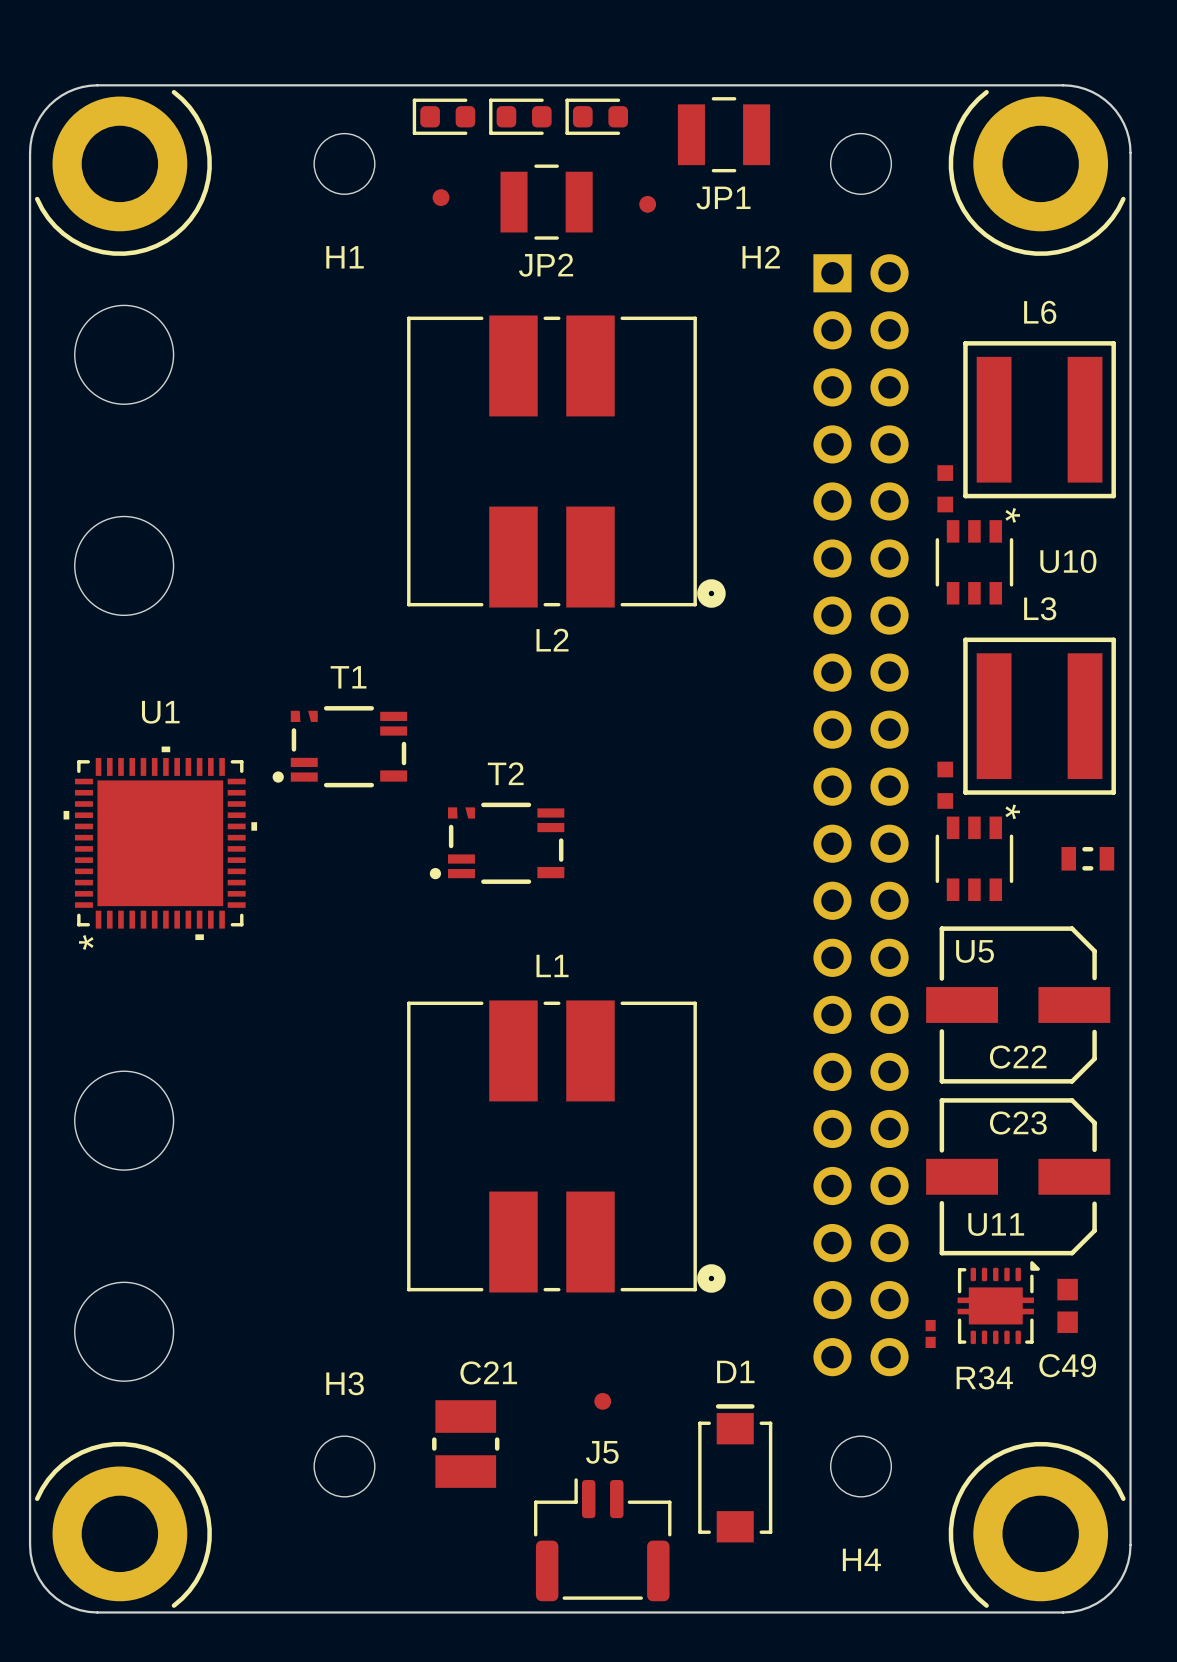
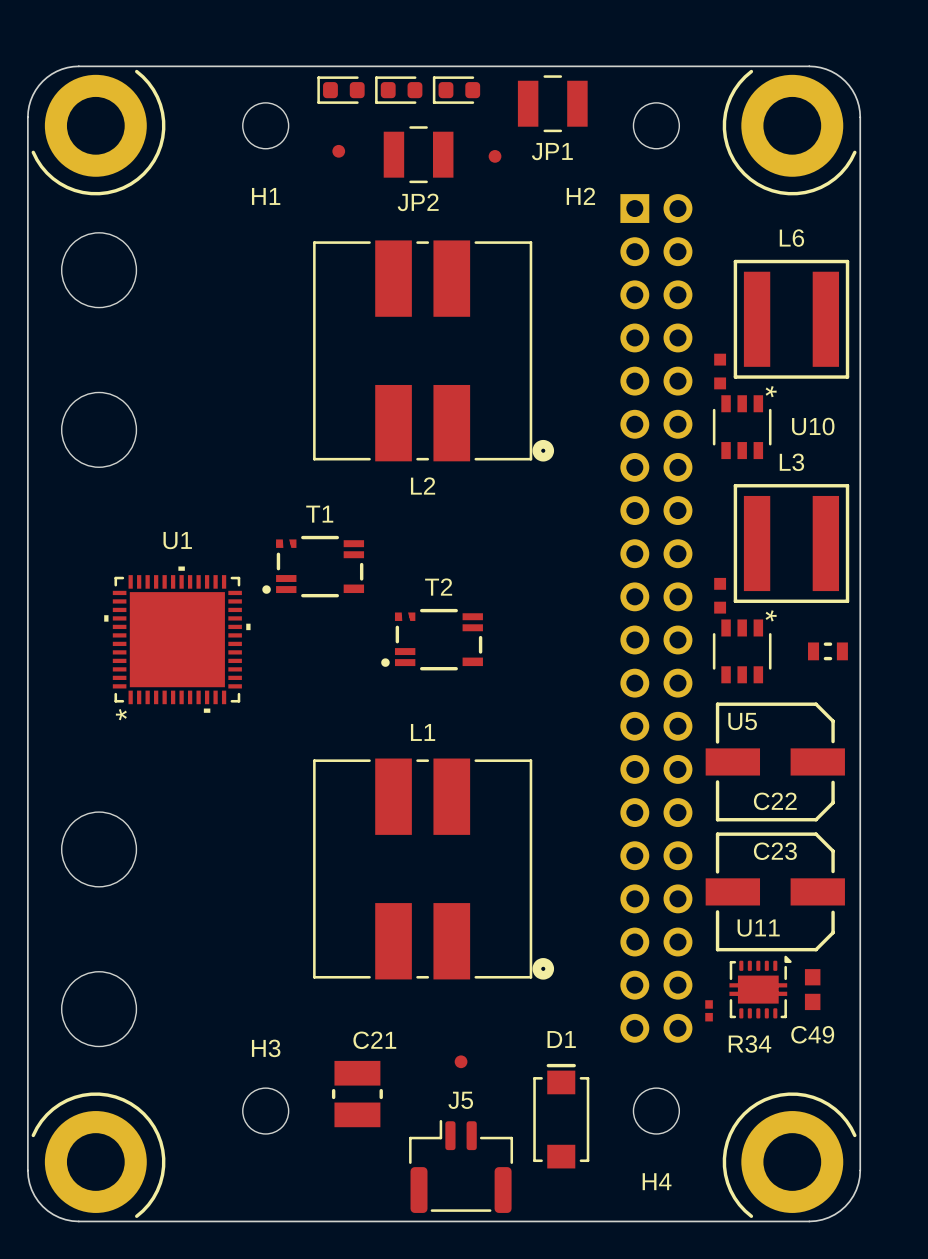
T1 position: (339, 746) -> (313, 566)
U1 position: (160, 843) -> (177, 639)
T2 position: (497, 843) -> (432, 639)

